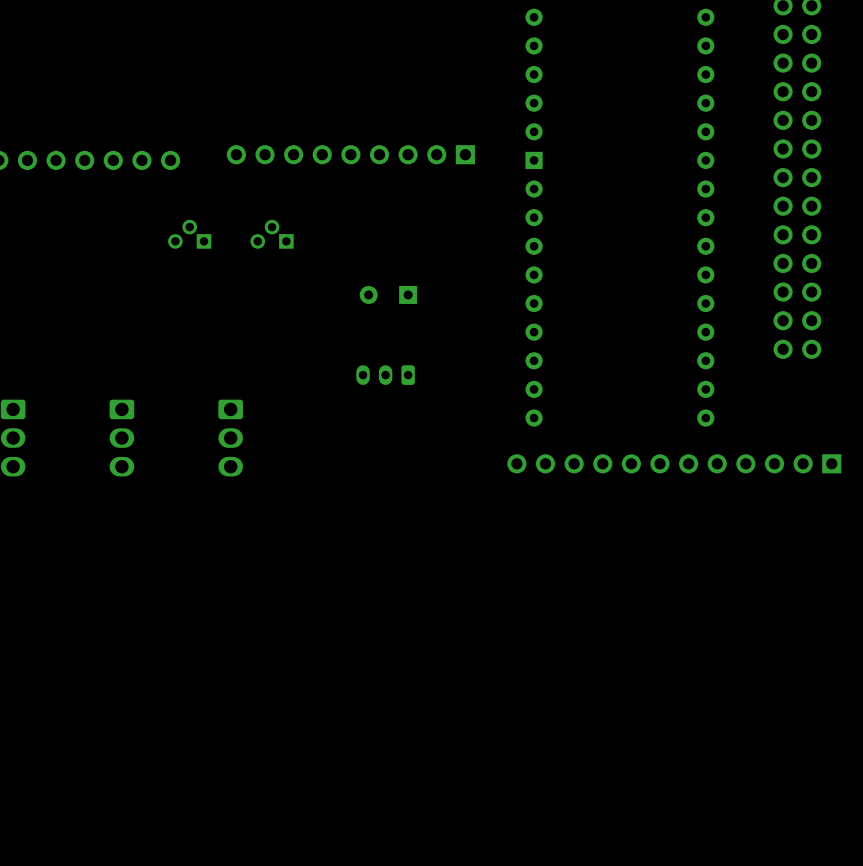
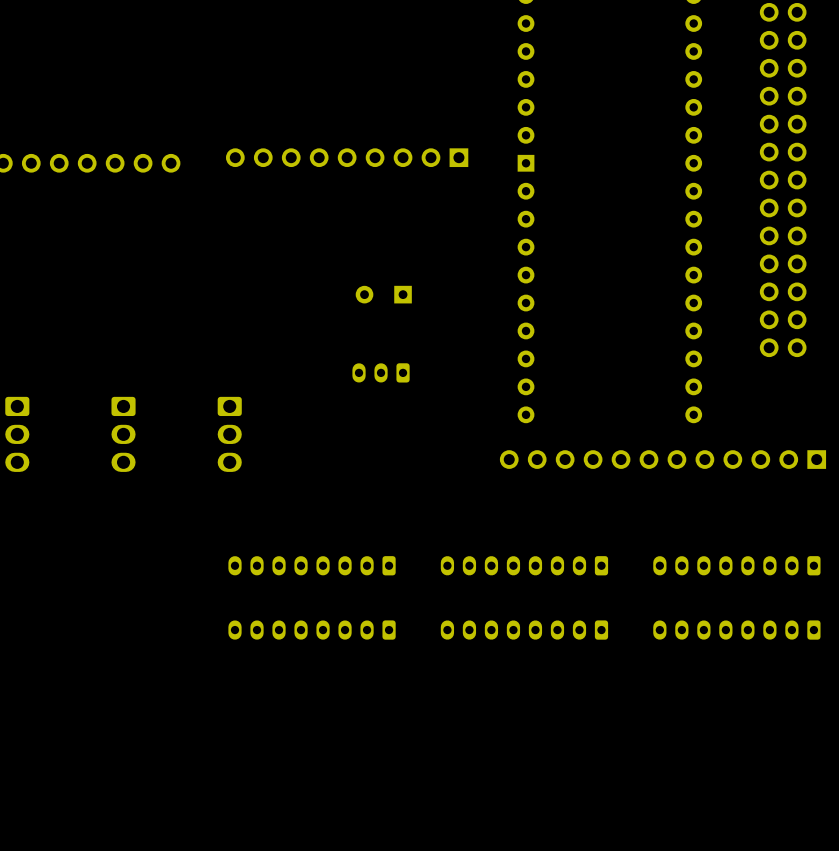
part: (189, 234) -> none
part: (272, 234) -> none
part: none -> (312, 565)
part: none -> (524, 565)
part: none -> (736, 565)
part: none -> (312, 630)
part: none -> (524, 630)
part: none -> (736, 630)

